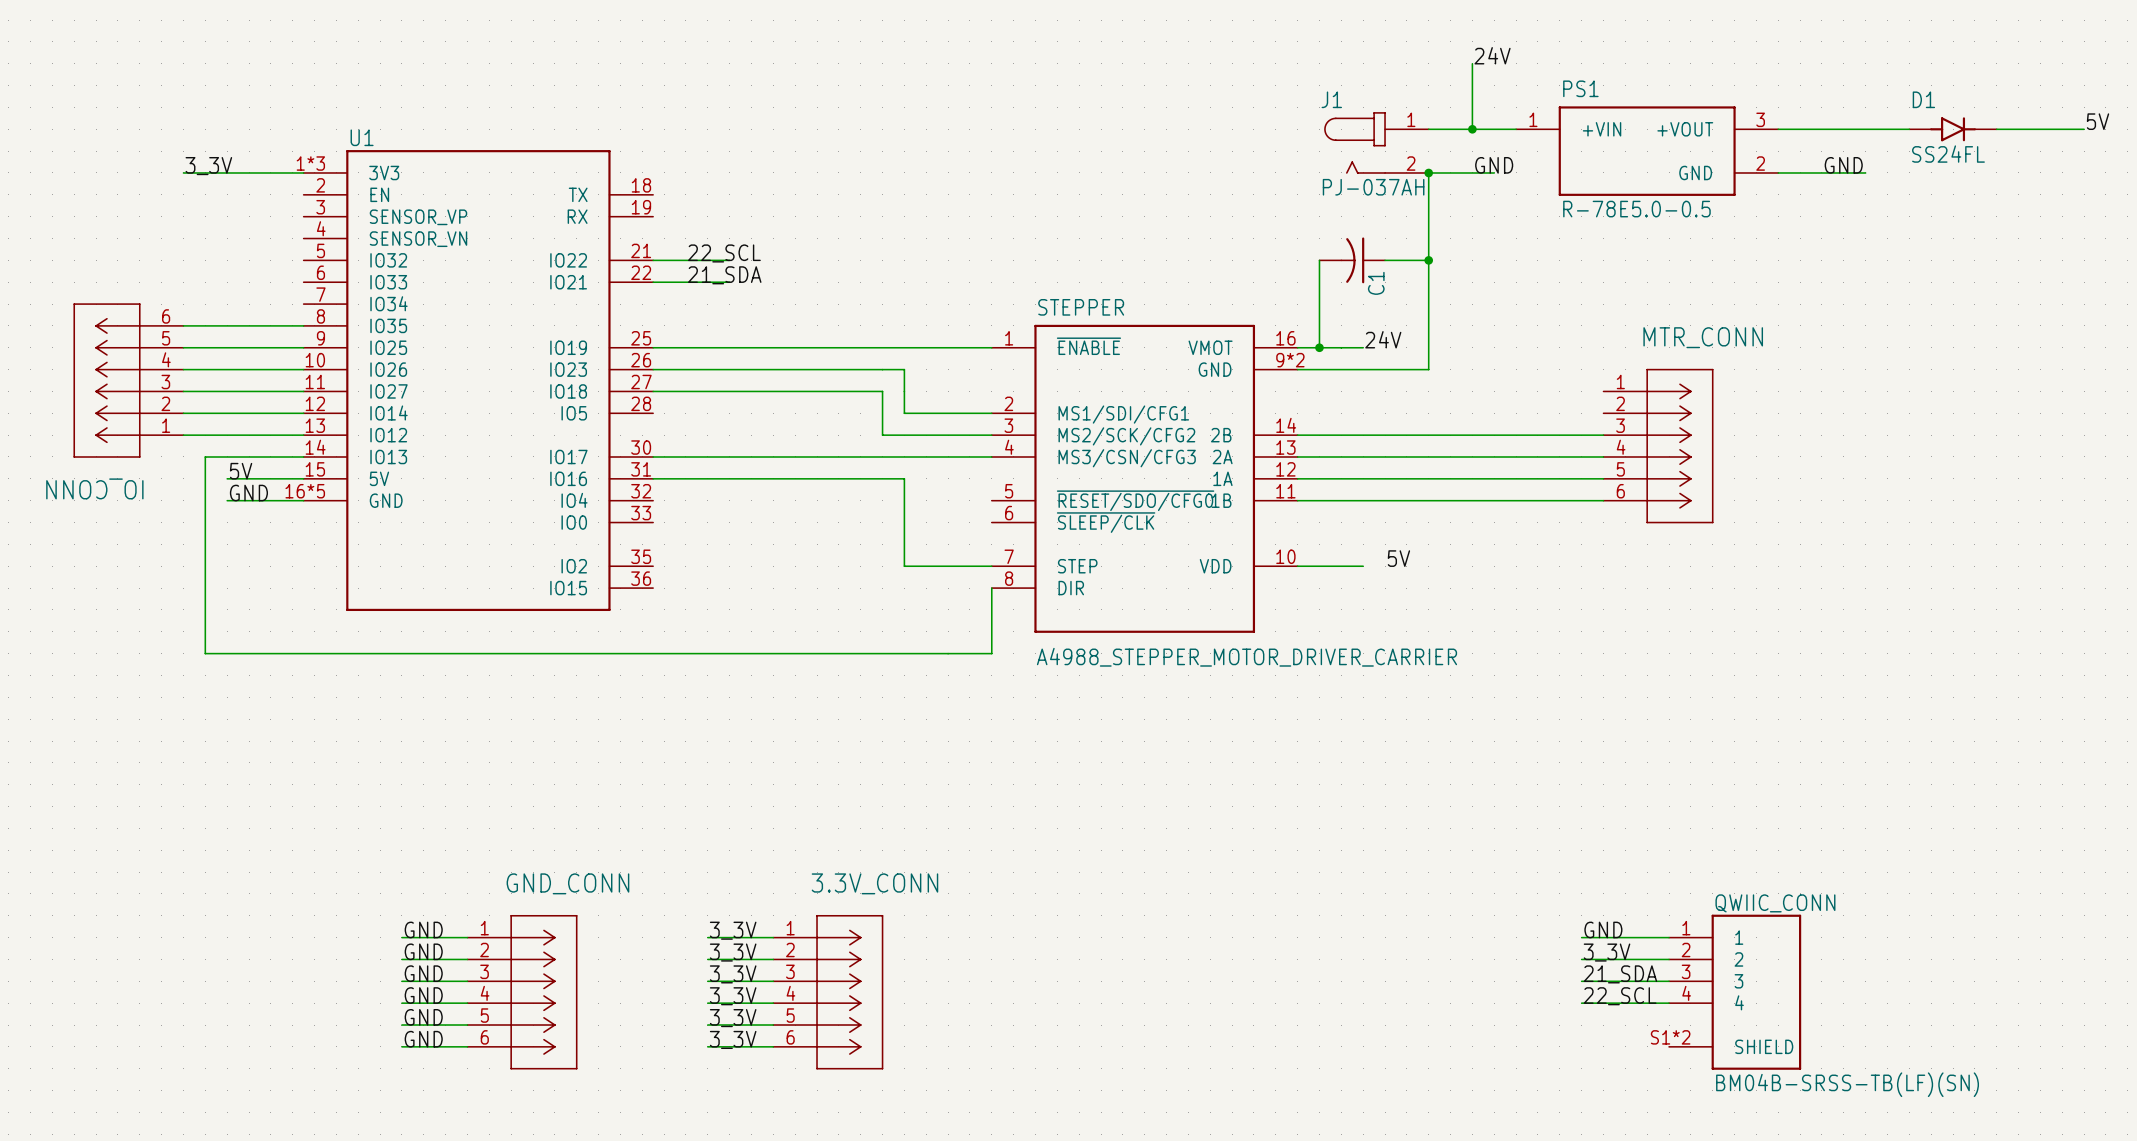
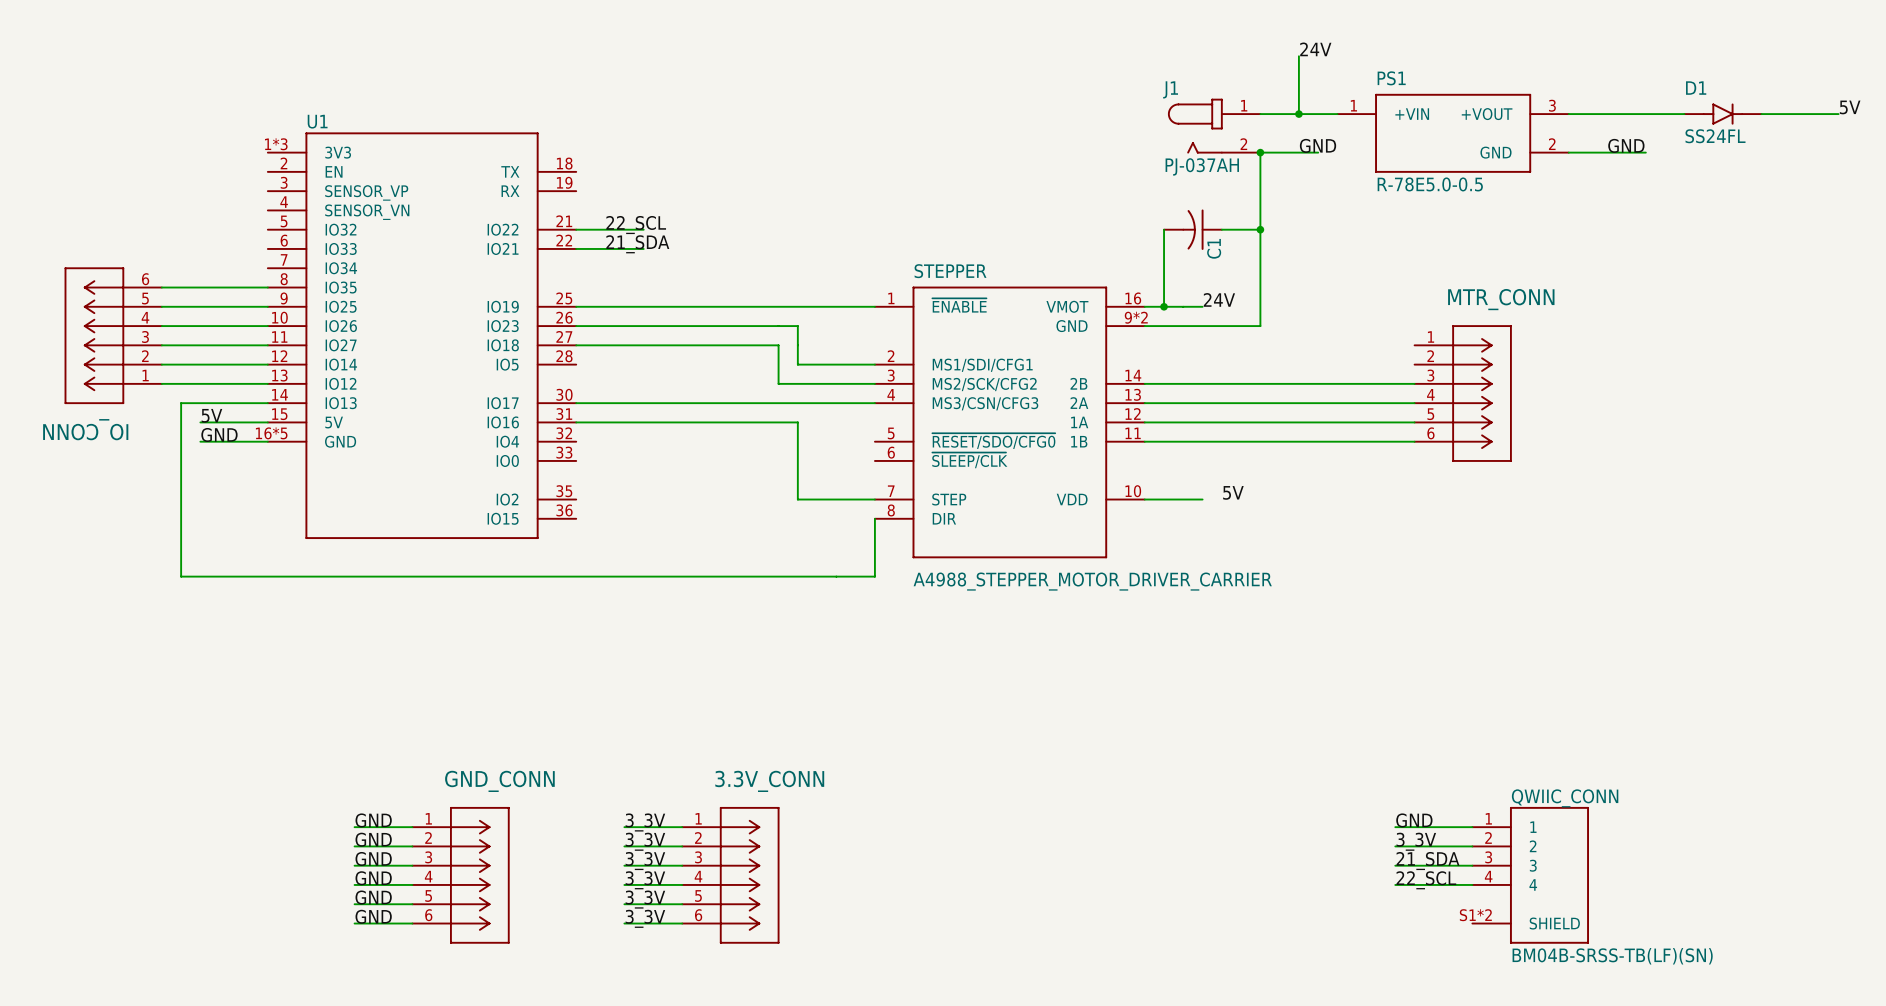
label: 3_3V (208, 166) -> none
wire: (183, 172) (303, 172) -> none

